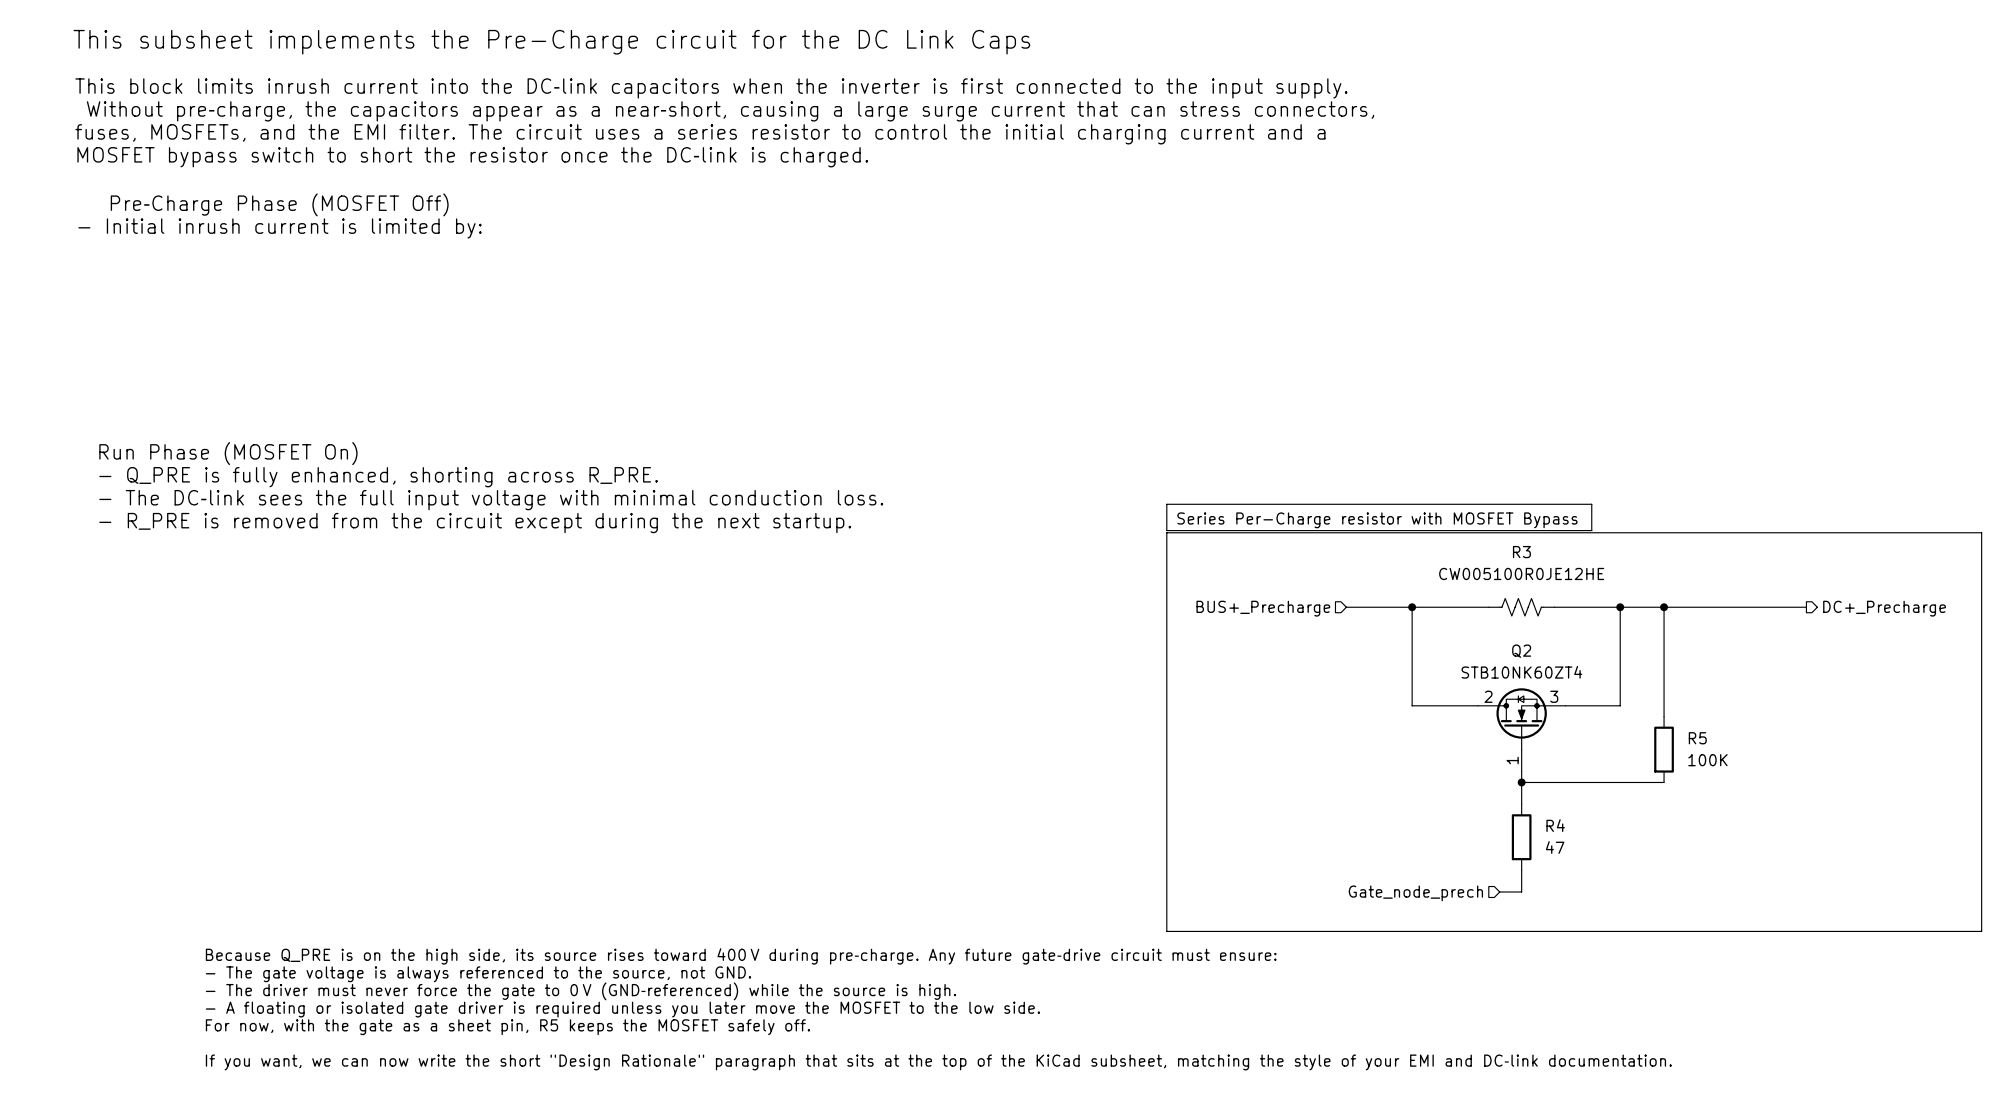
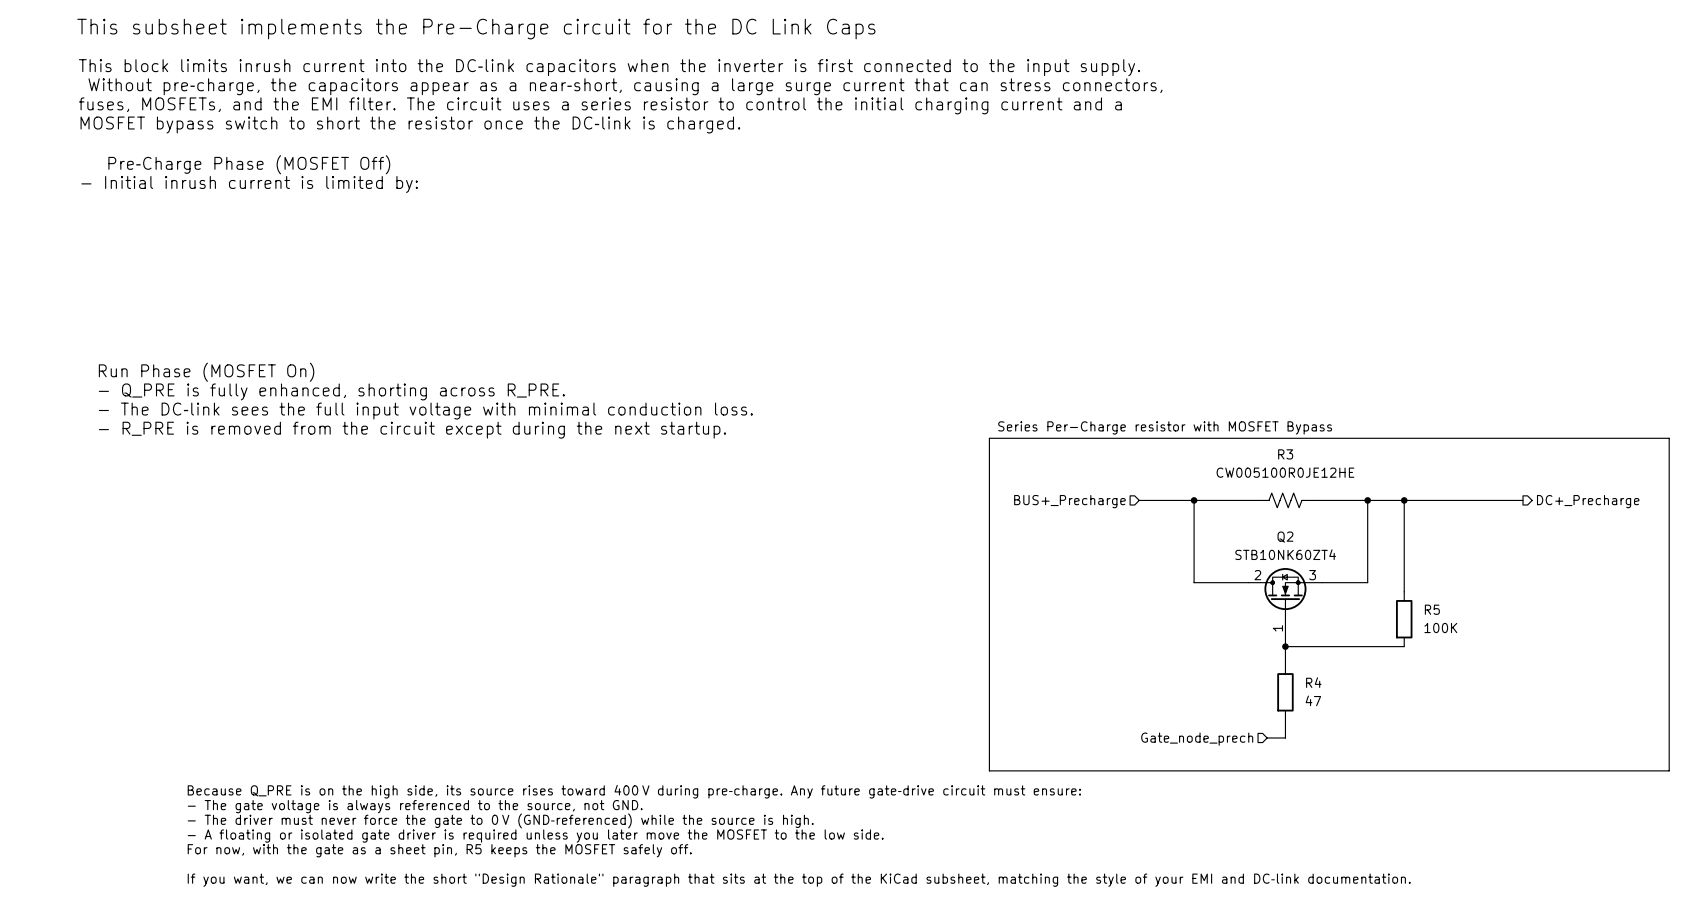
line: (1166, 504) (1591, 504) (1591, 530) (1166, 530) (1166, 504) -> none

